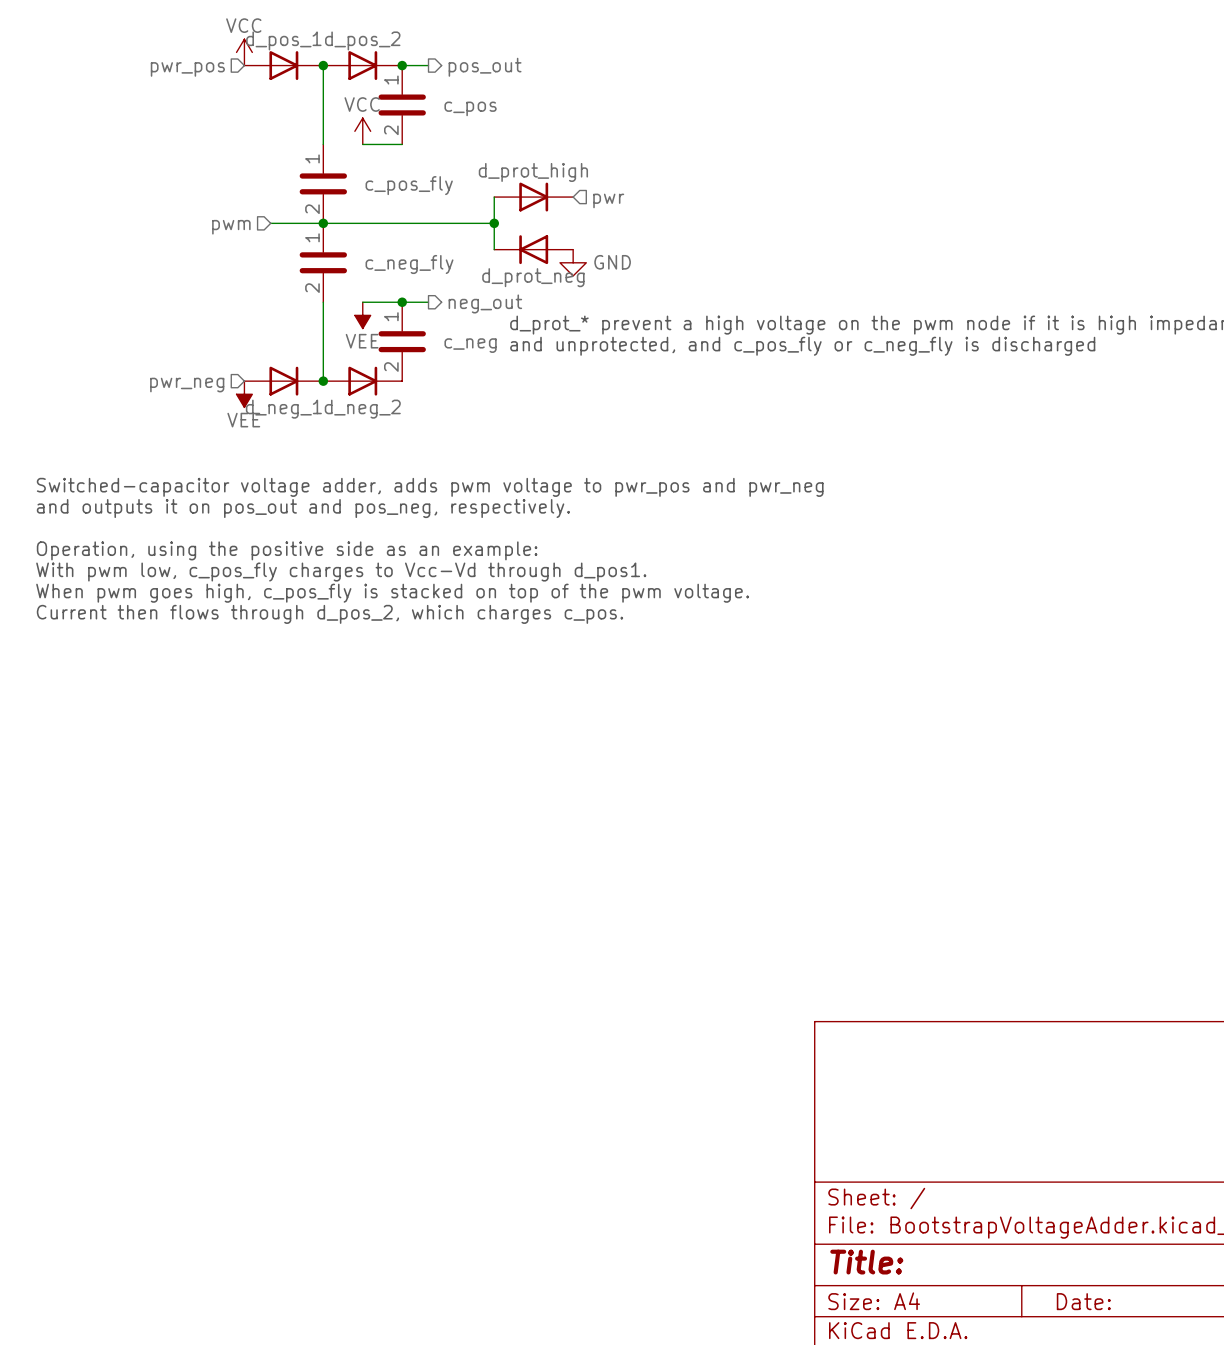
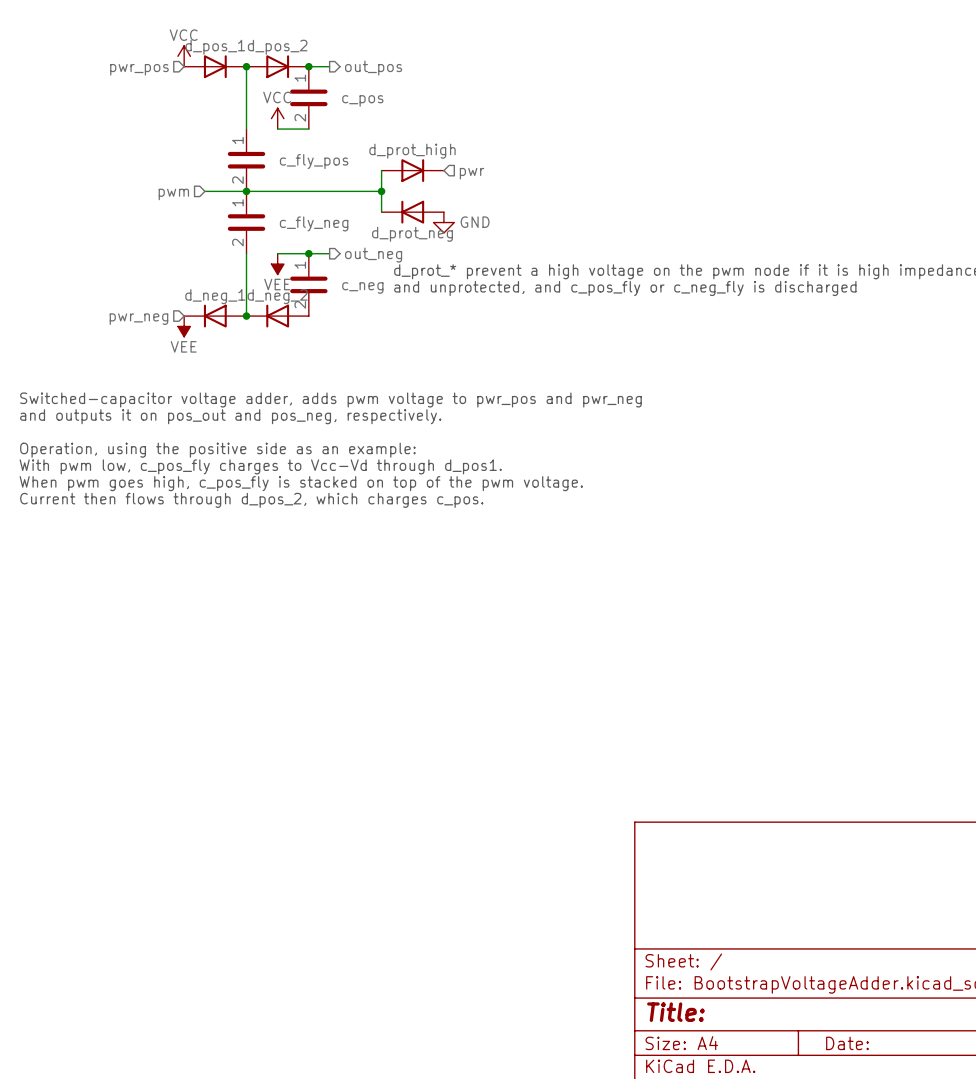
hierarchical label: pos_out (485, 67) -> out_pos (373, 68)
c_pos_fly name: c_pos_fly (409, 185) -> c_fly_pos (314, 161)
c_neg_fly name: c_neg_fly (409, 264) -> c_fly_neg (314, 223)
hierarchical label: neg_out (485, 303) -> out_neg (373, 255)
d_neg_1 rotation: 0° (283, 381) -> 180° (215, 316)
d_neg_2 rotation: 0° (362, 381) -> 180° (277, 316)

